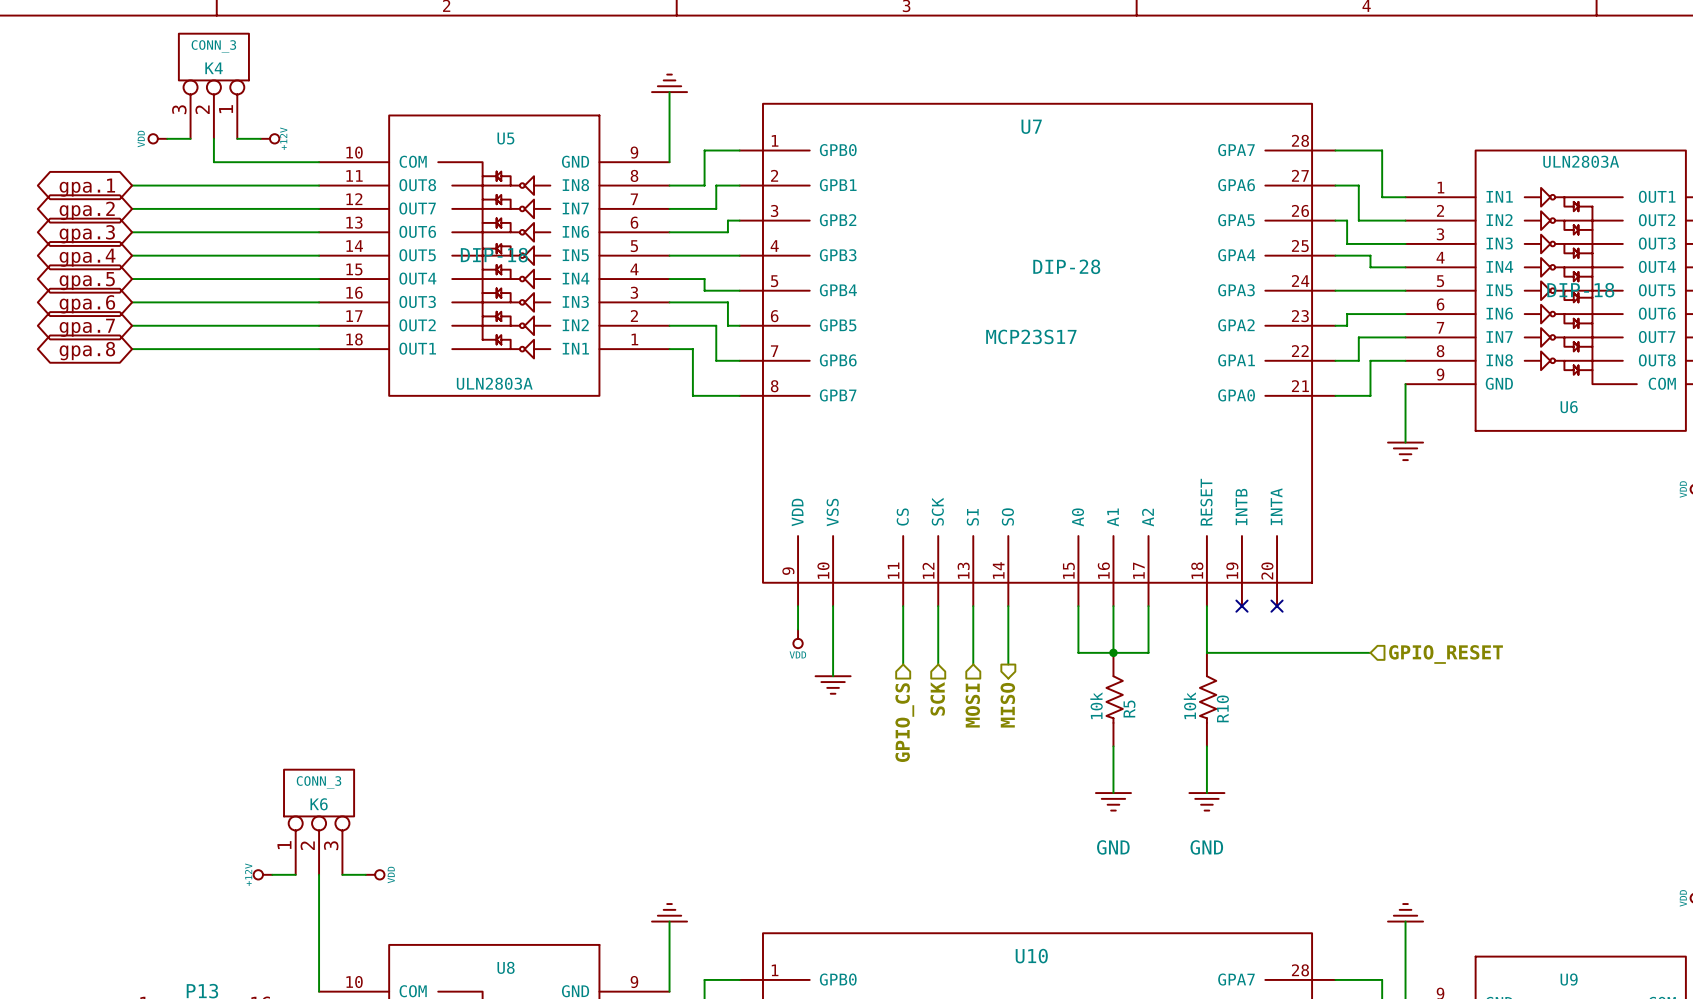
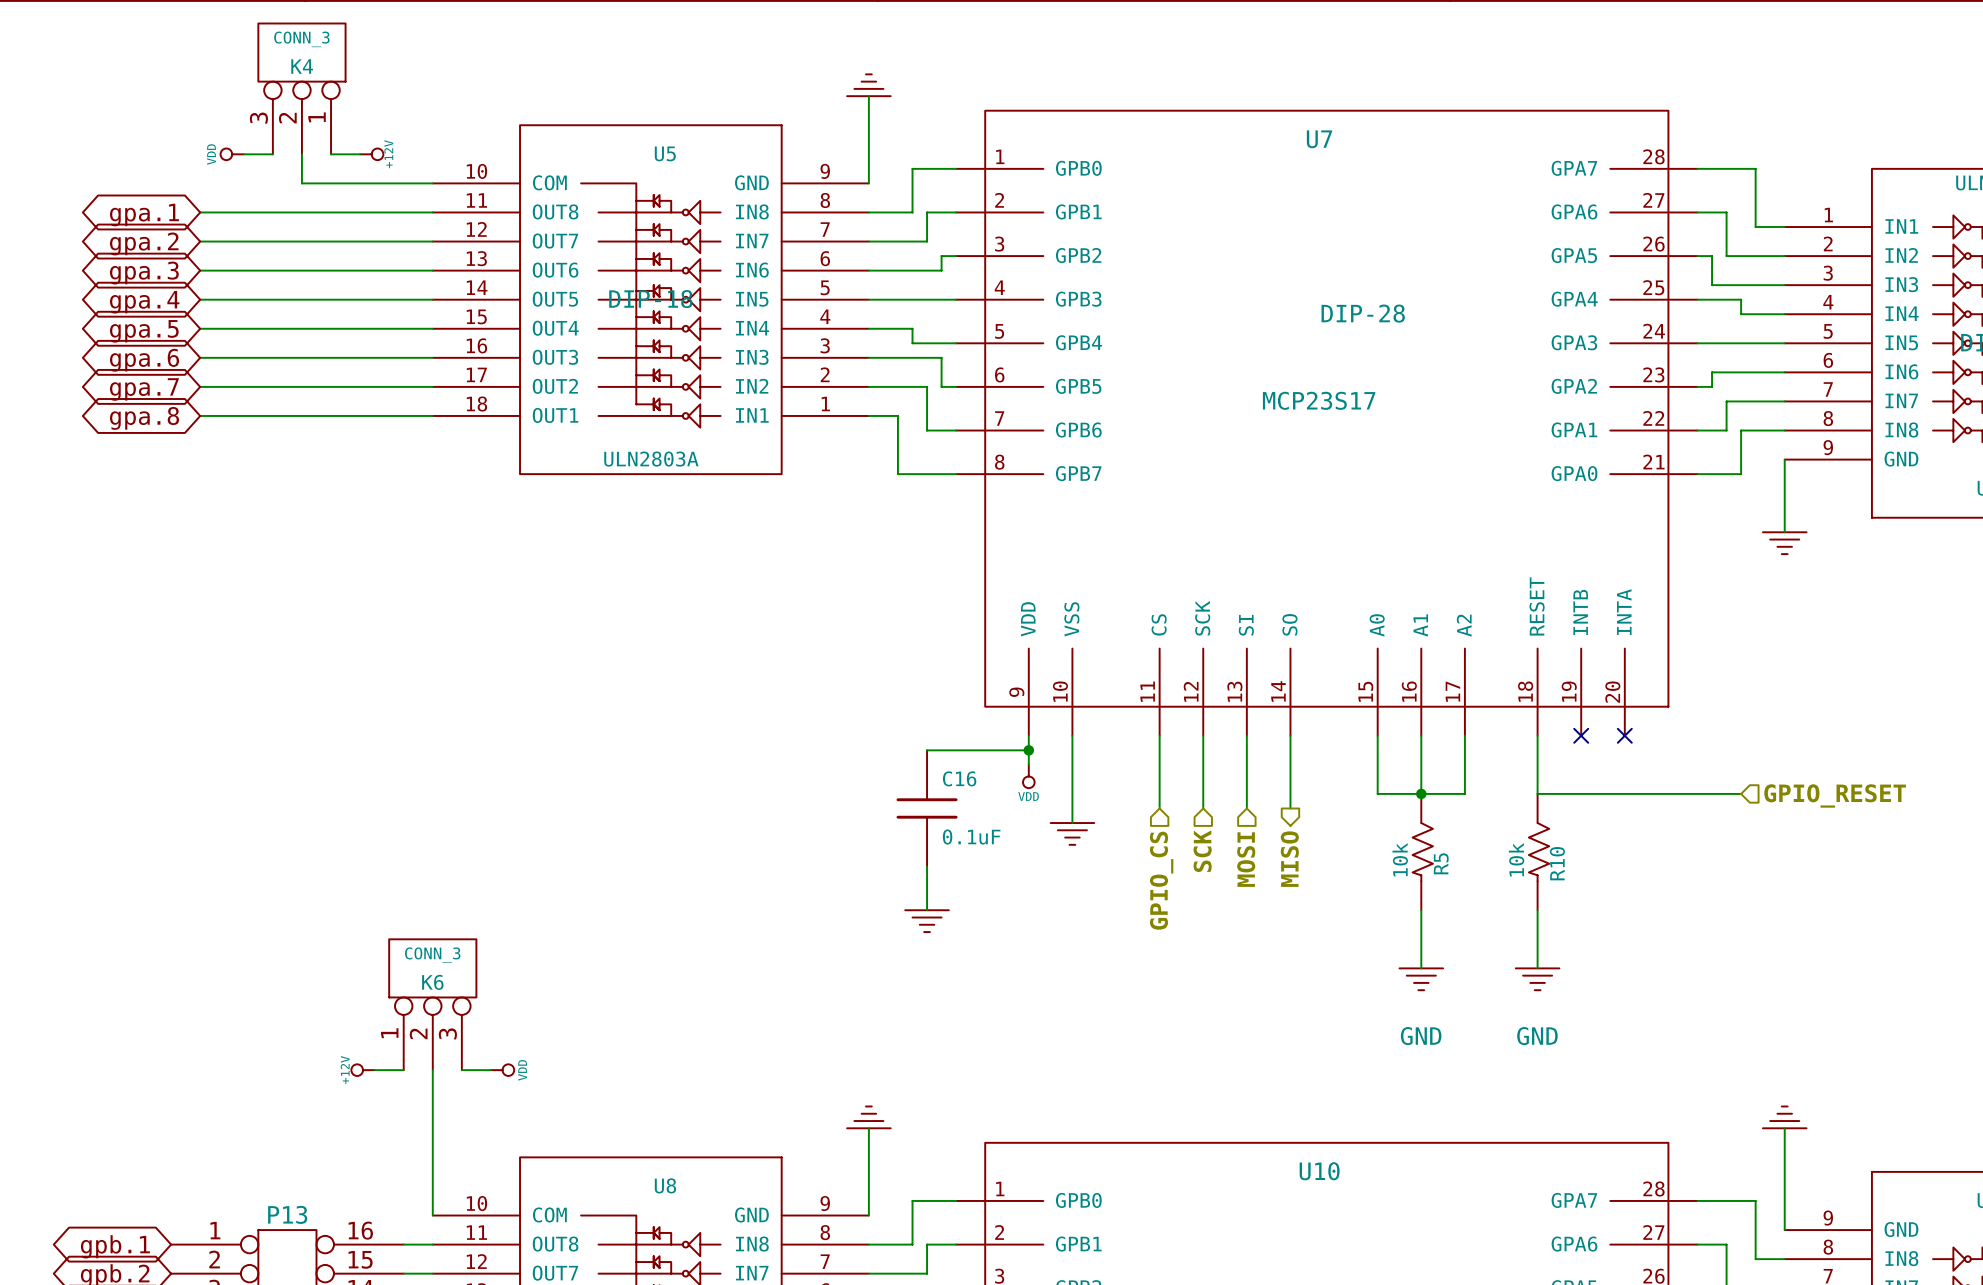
wire: none -> (927, 750) (1028, 750)
junction: none -> (1028, 750)
C16: none -> 0.1uF (927, 808)
wire: none -> (927, 866) (927, 910)
power symbol: none -> (927, 921)

